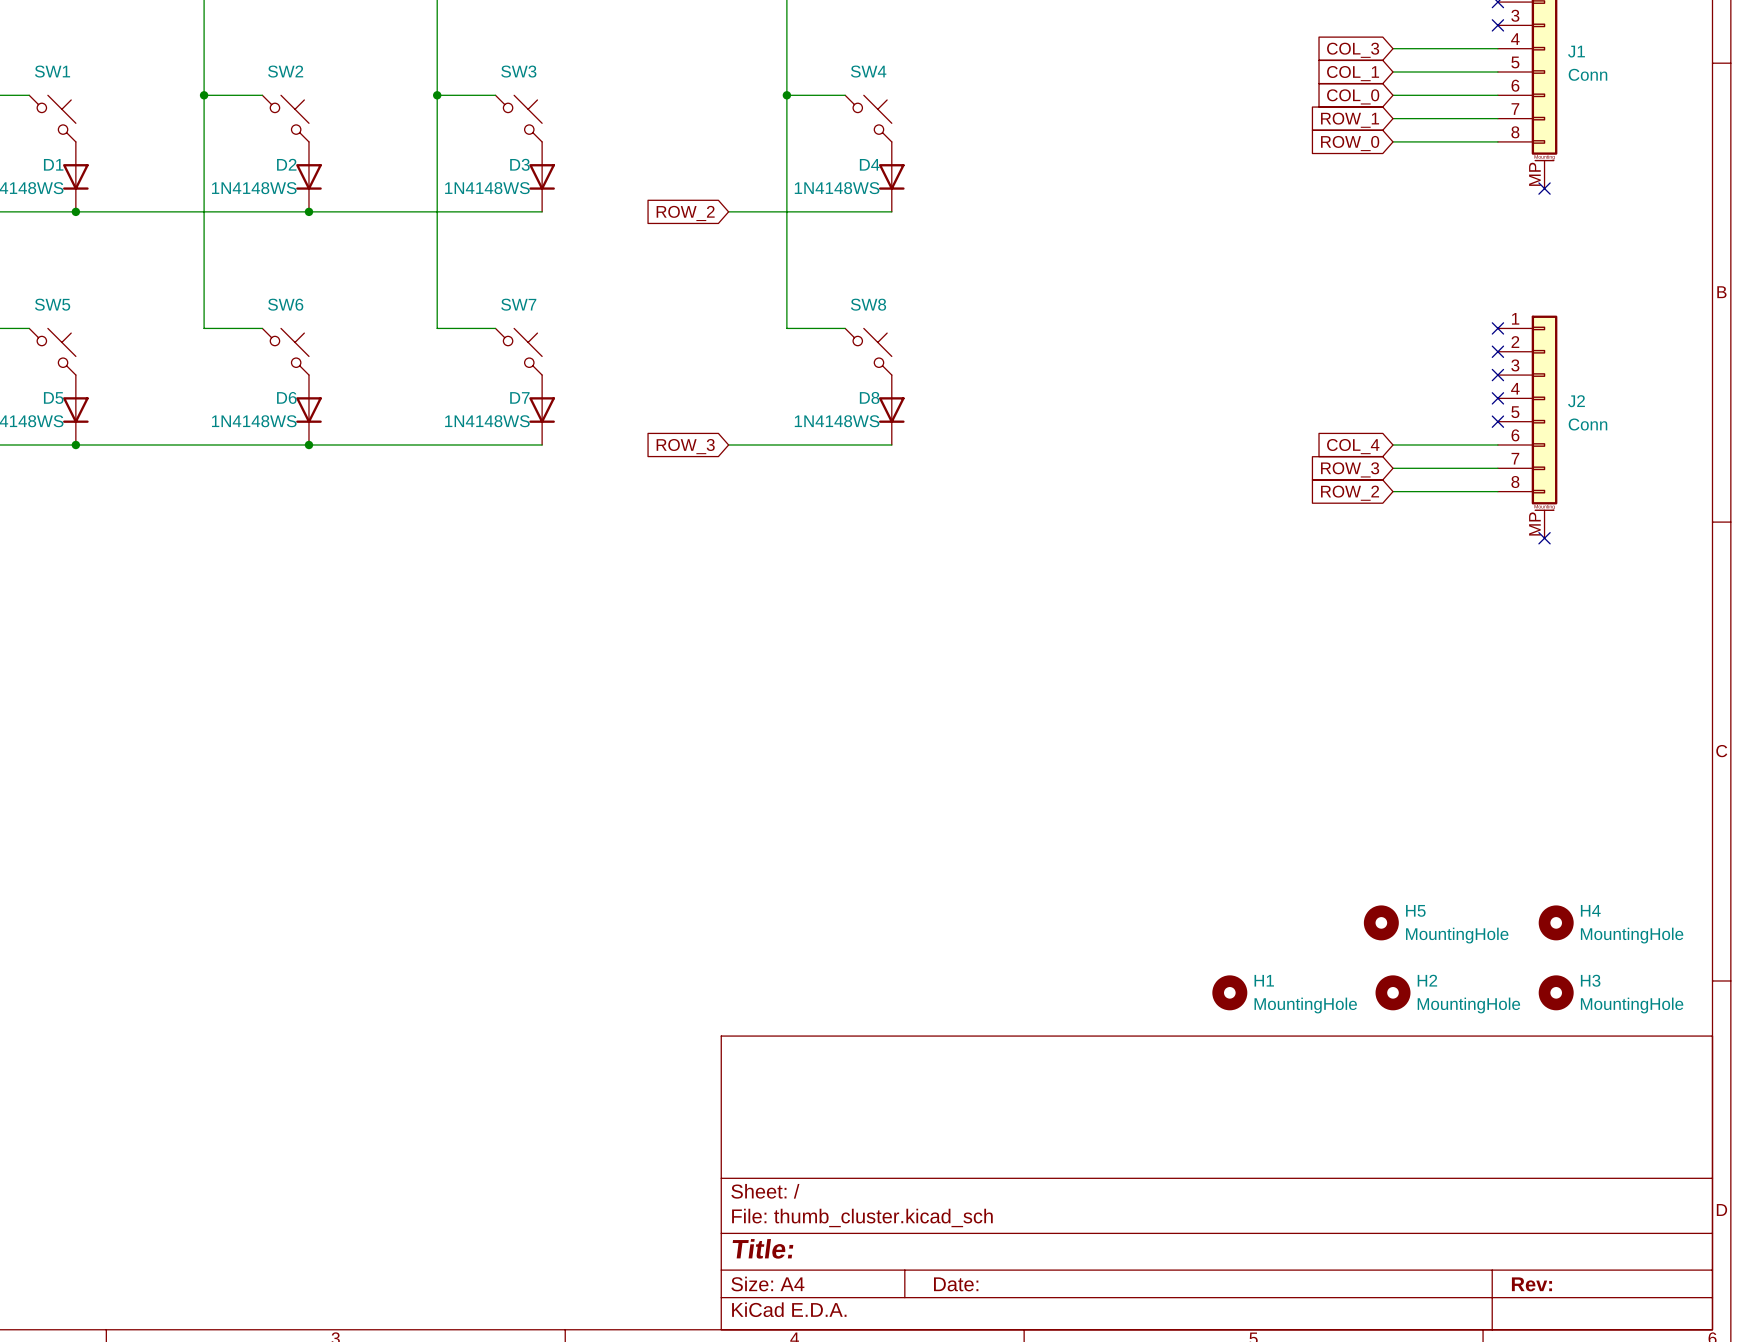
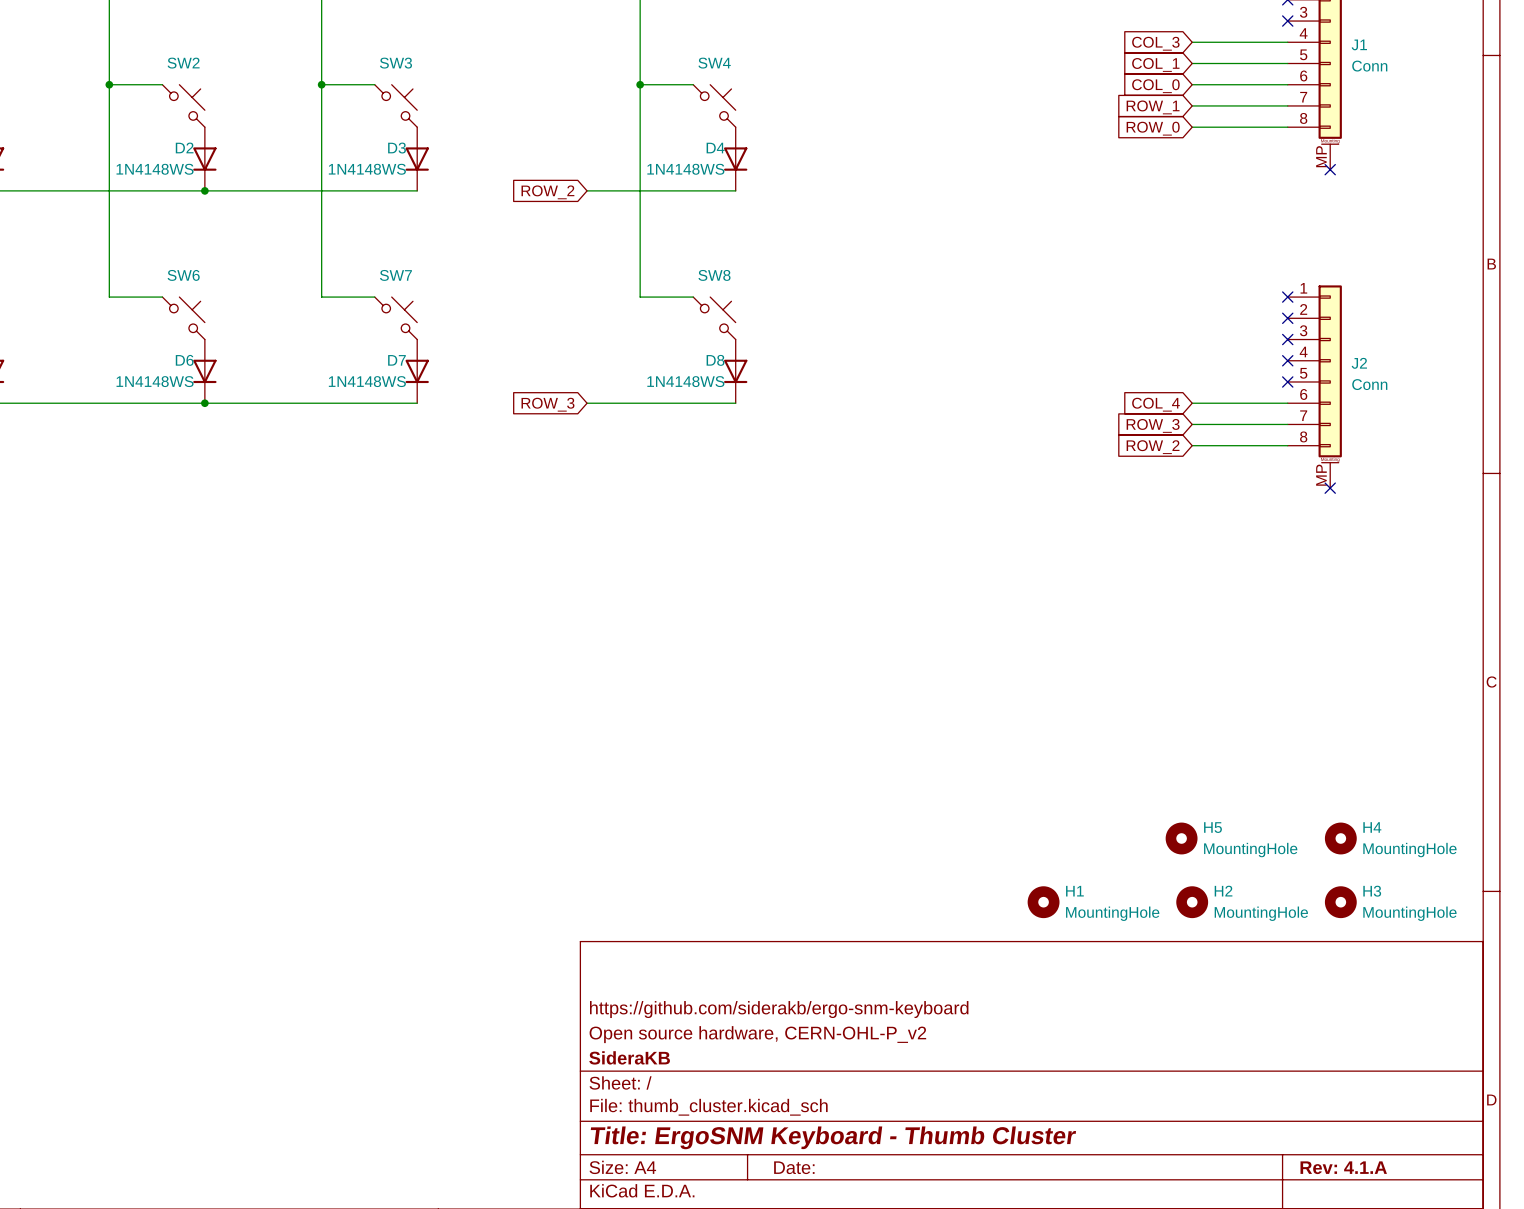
title block: none -> https://github.com/siderakb/ergo-snm-keyboard (779, 1009)
title block: none -> Open source hardware, CERN-OHL-P_v2 (757, 1034)
title block: none -> SideraKB (629, 1057)
title block: Title: (762, 1248) -> Title: ErgoSNM Keyboard - Thumb Cluster (833, 1137)
title block: Rev: (1531, 1284) -> Rev: 4.1.A (1343, 1167)

